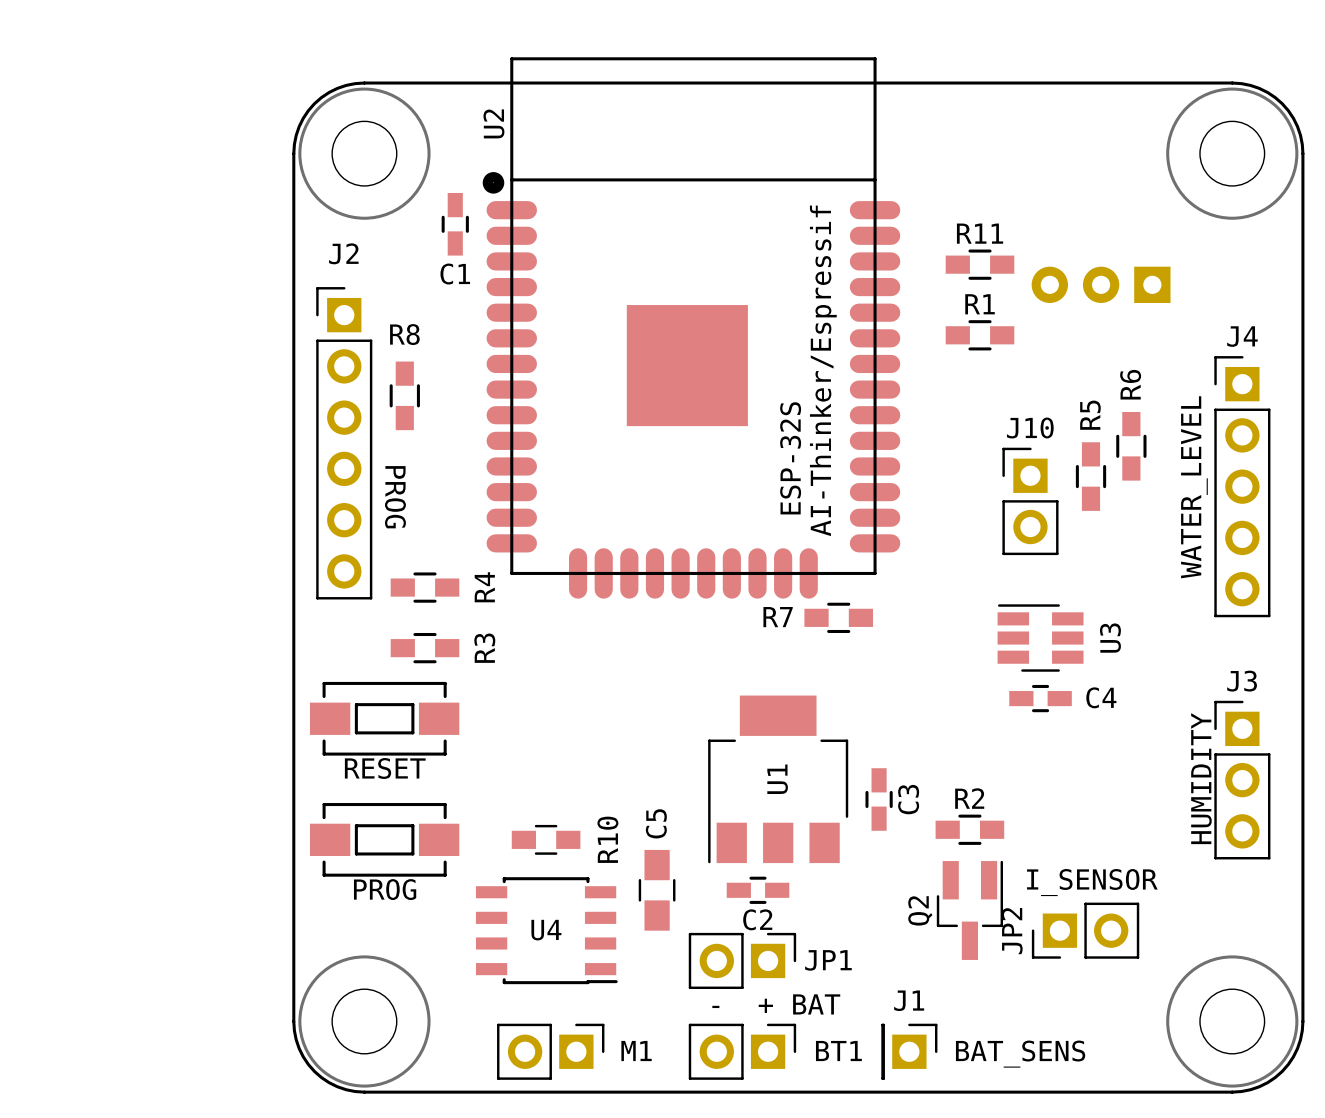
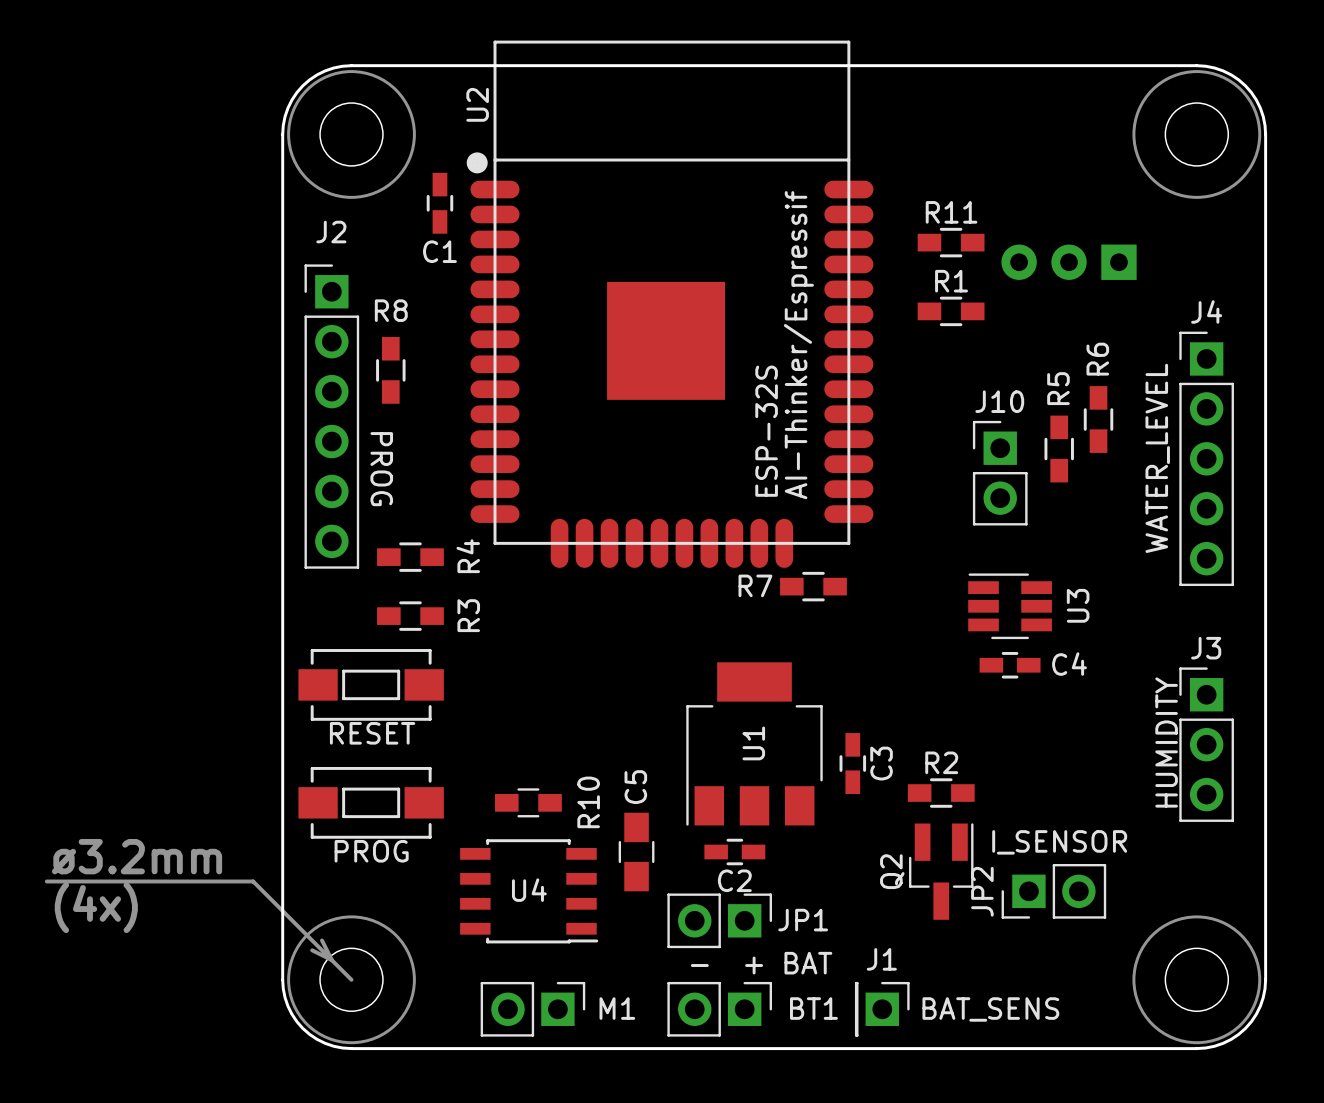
text: none -> ø3.2mm (137, 856)
line: none -> (46, 881) (253, 881) (351, 979)
text: none -> (4x) (96, 907)
line: none -> (322, 940) (331, 960) (312, 950)

